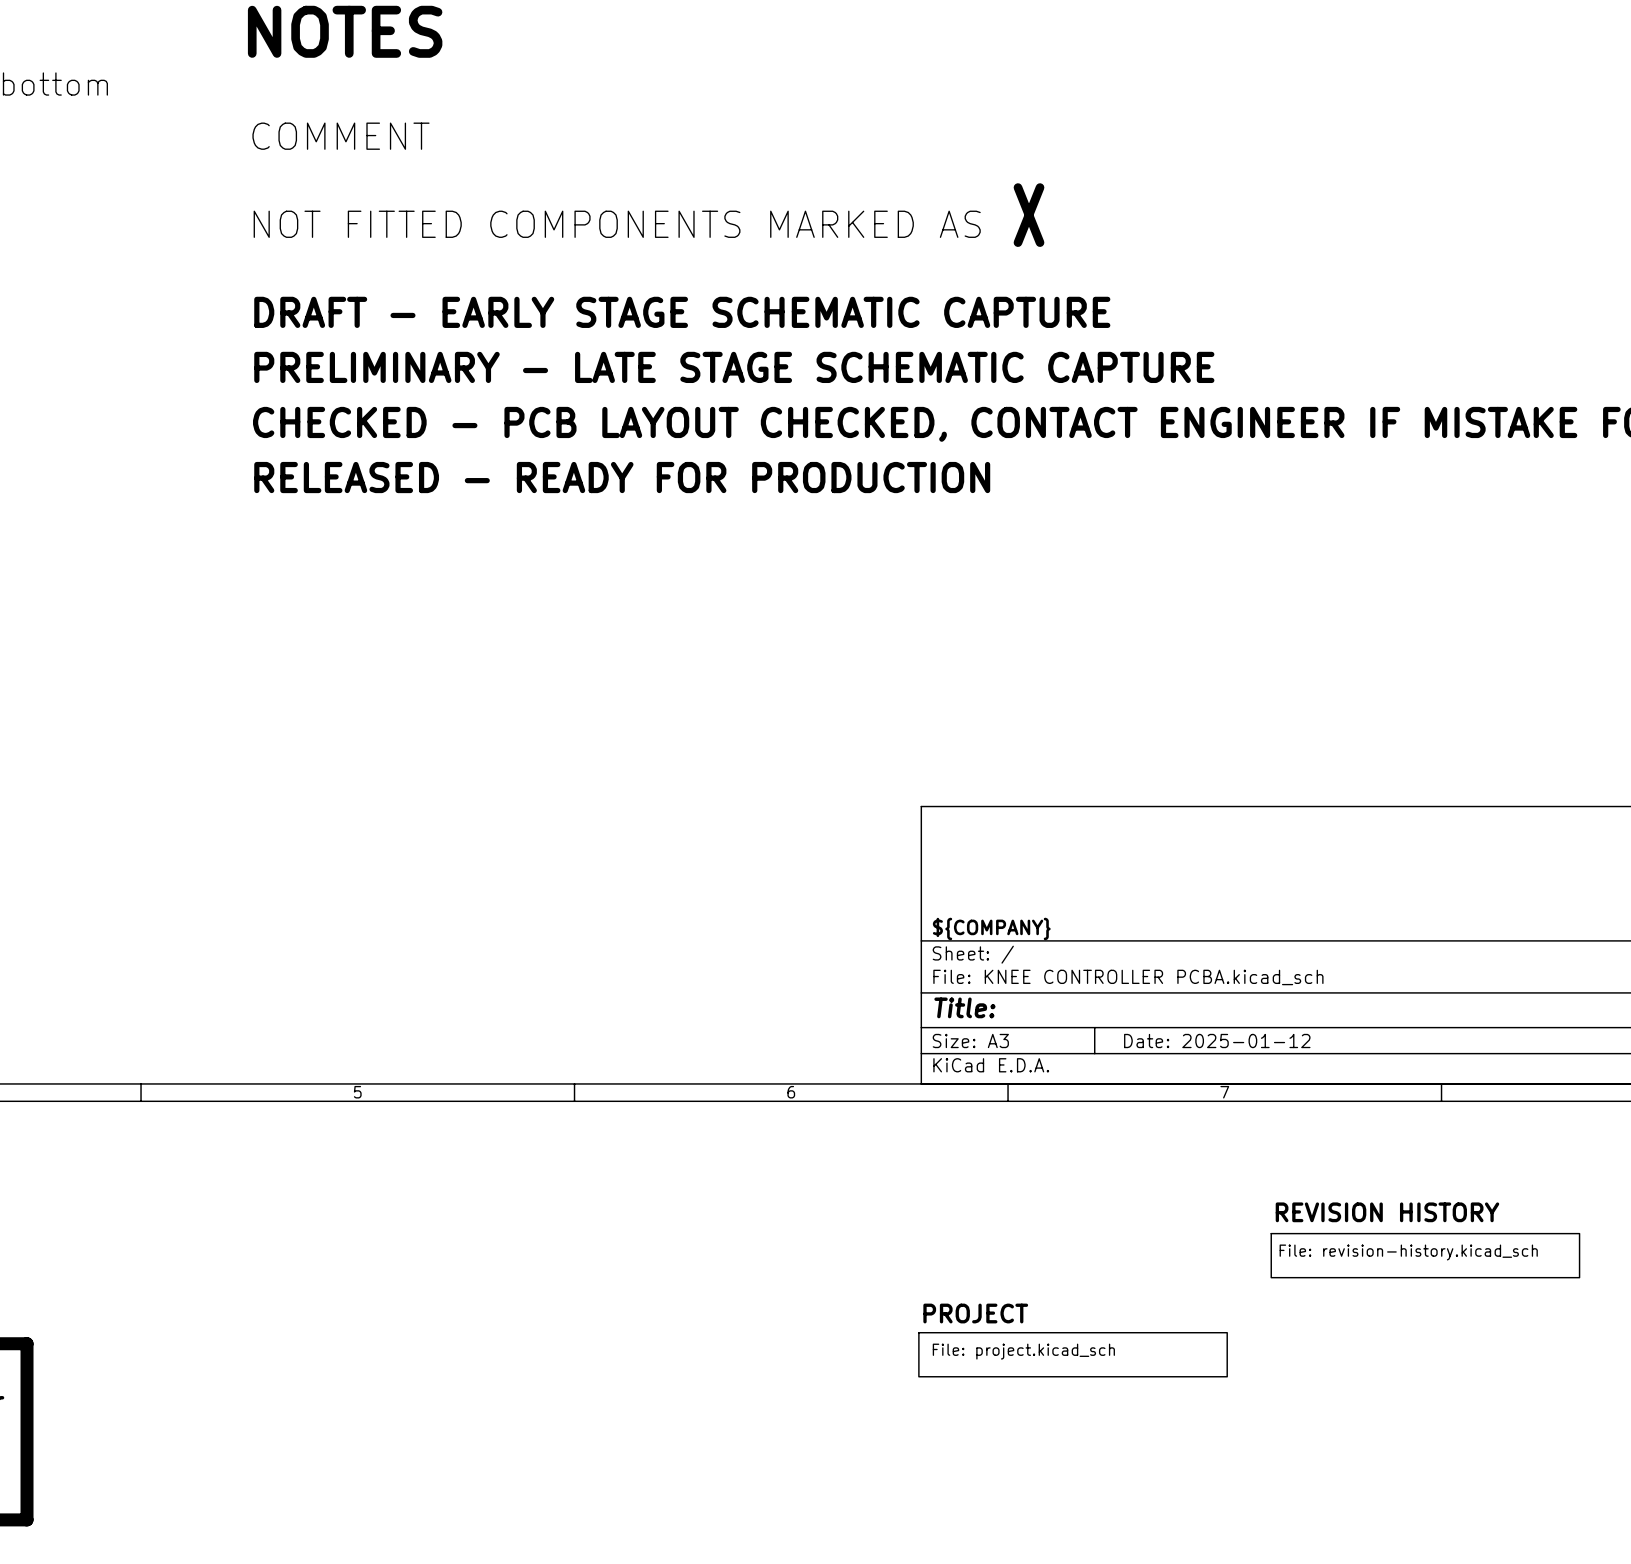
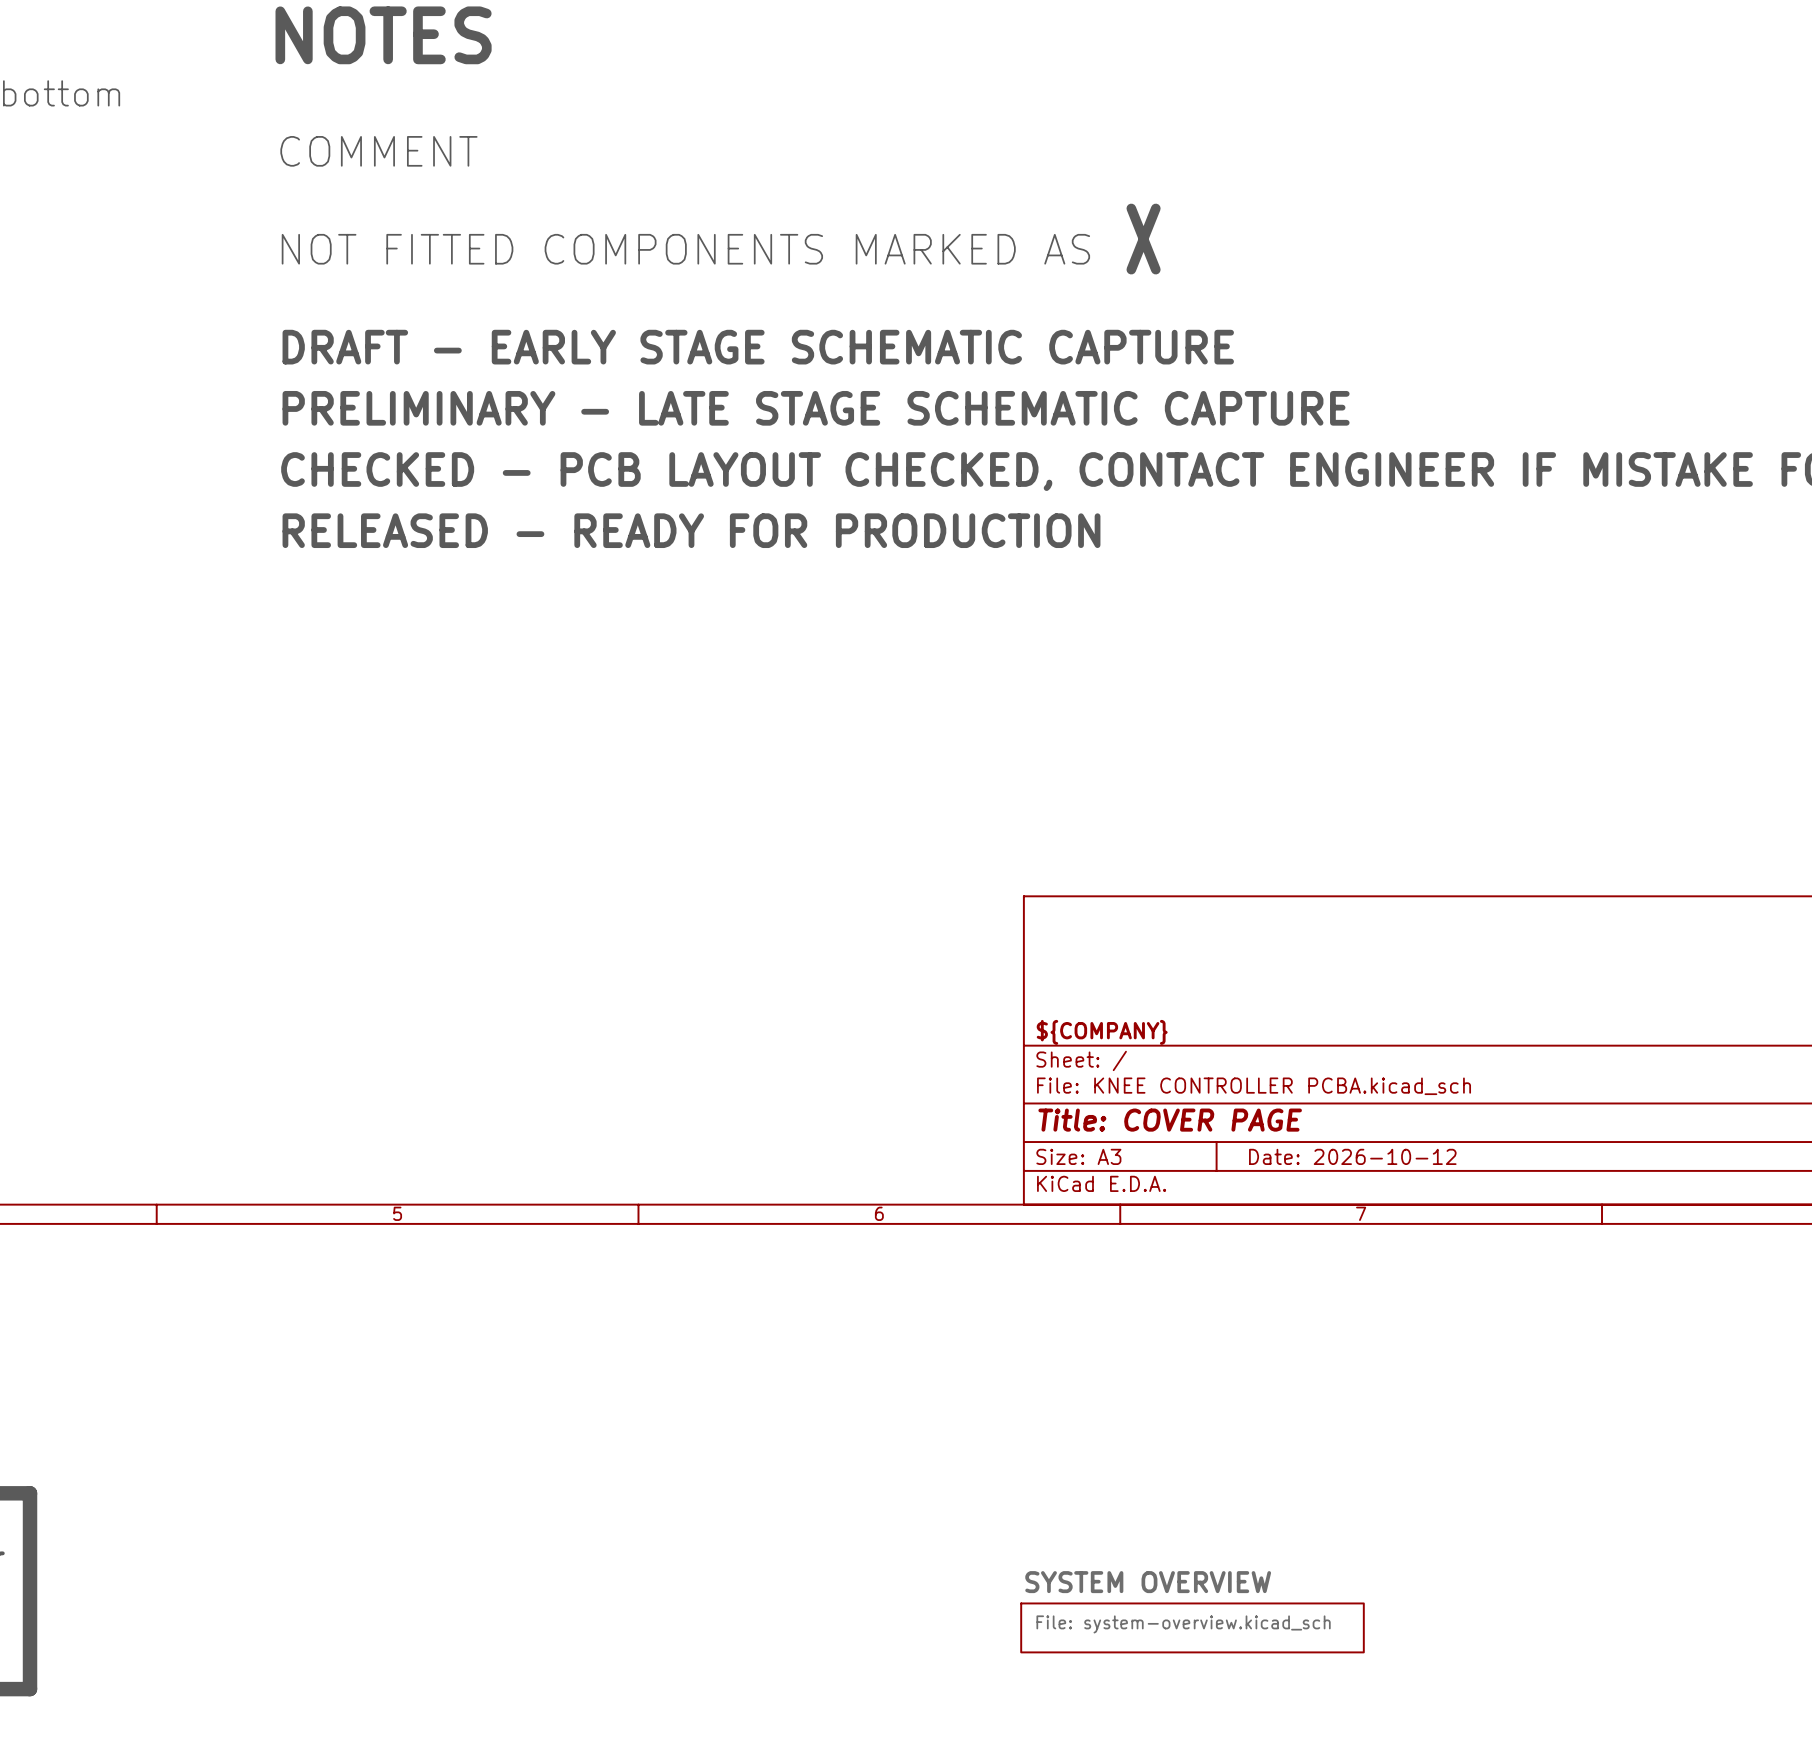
title block: Title: (964, 1007) -> Title: COVER PAGE (1170, 1120)
title block: Date: 2025-01-12 (1217, 1041) -> Date: 2026-10-12 (1352, 1156)
sheet REVISION HISTORY: File: revision-history.kicad_sch (1425, 1255) -> none
sheet PROJECT: File: project.kicad_sch (1073, 1354) -> none
sheet SYSTEM OVERVIEW: none -> File: system-overview.kicad_sch (1192, 1627)

